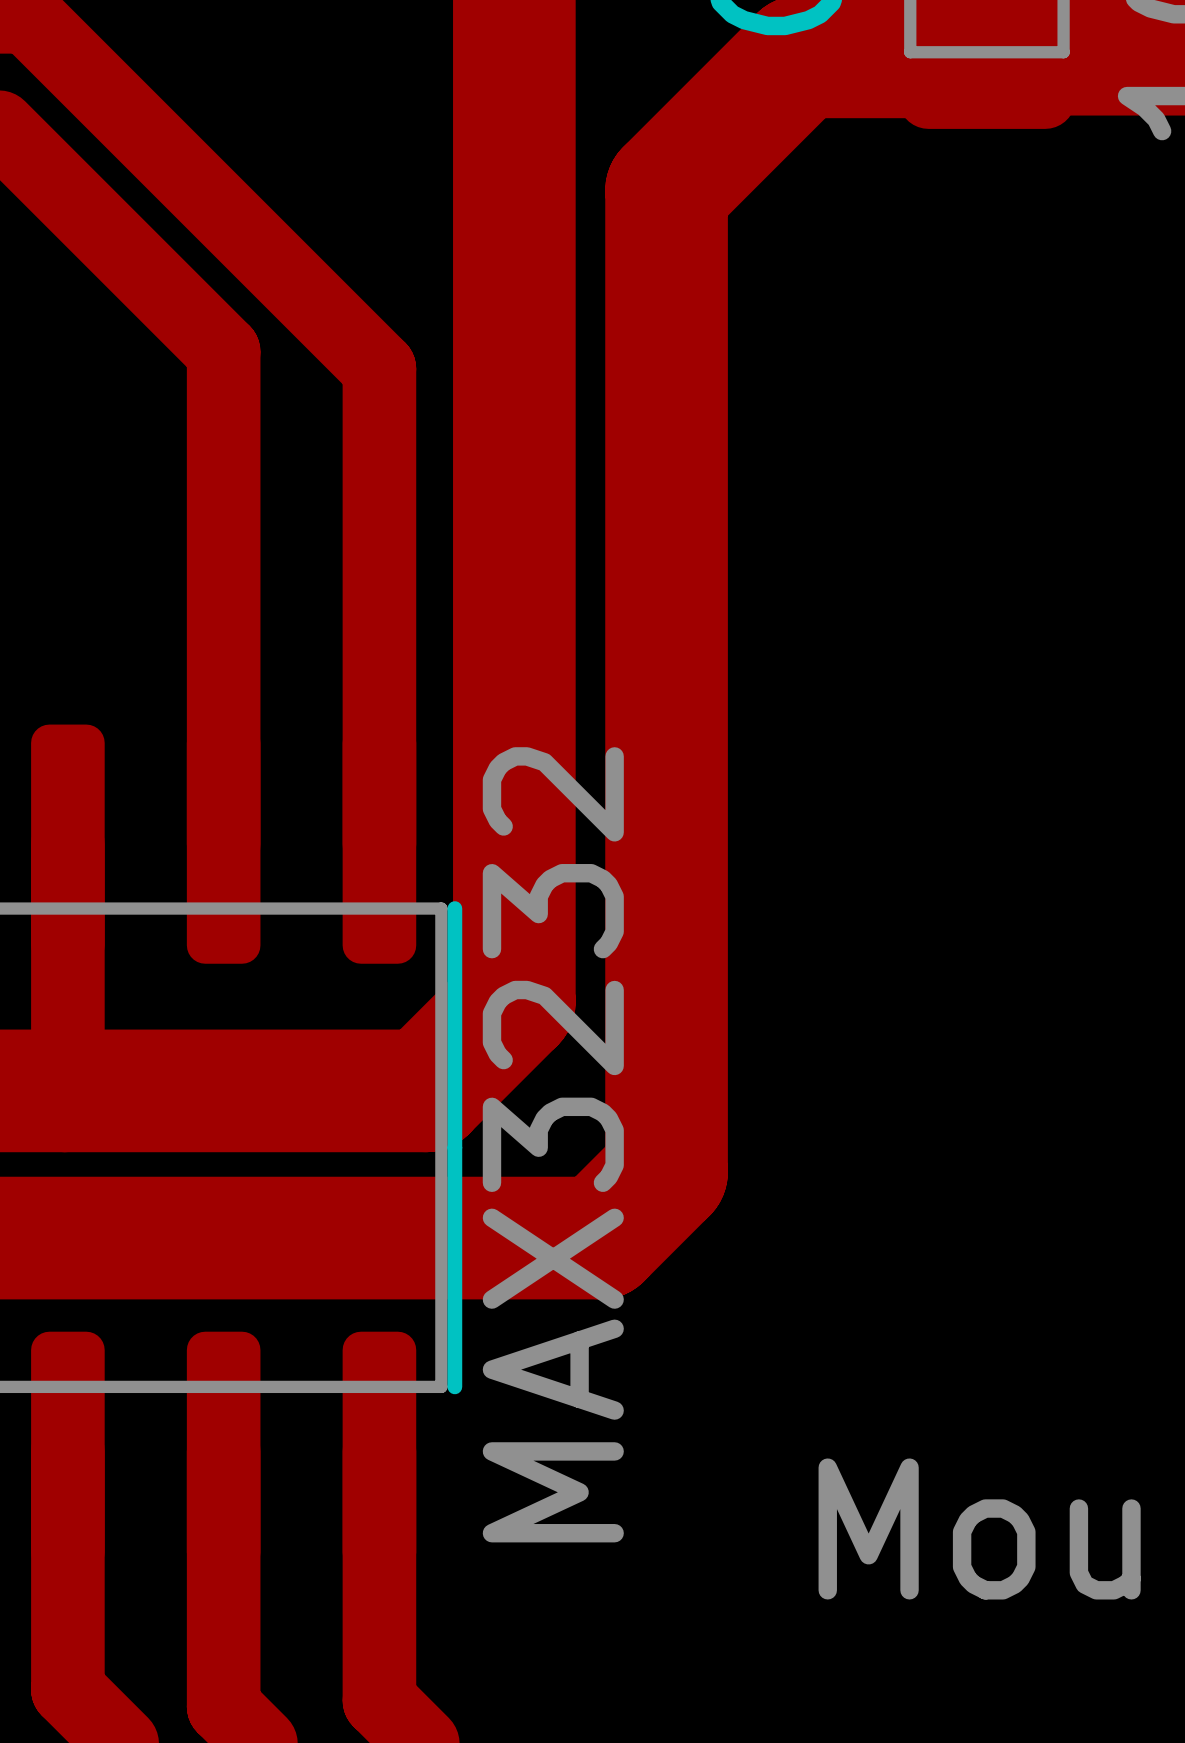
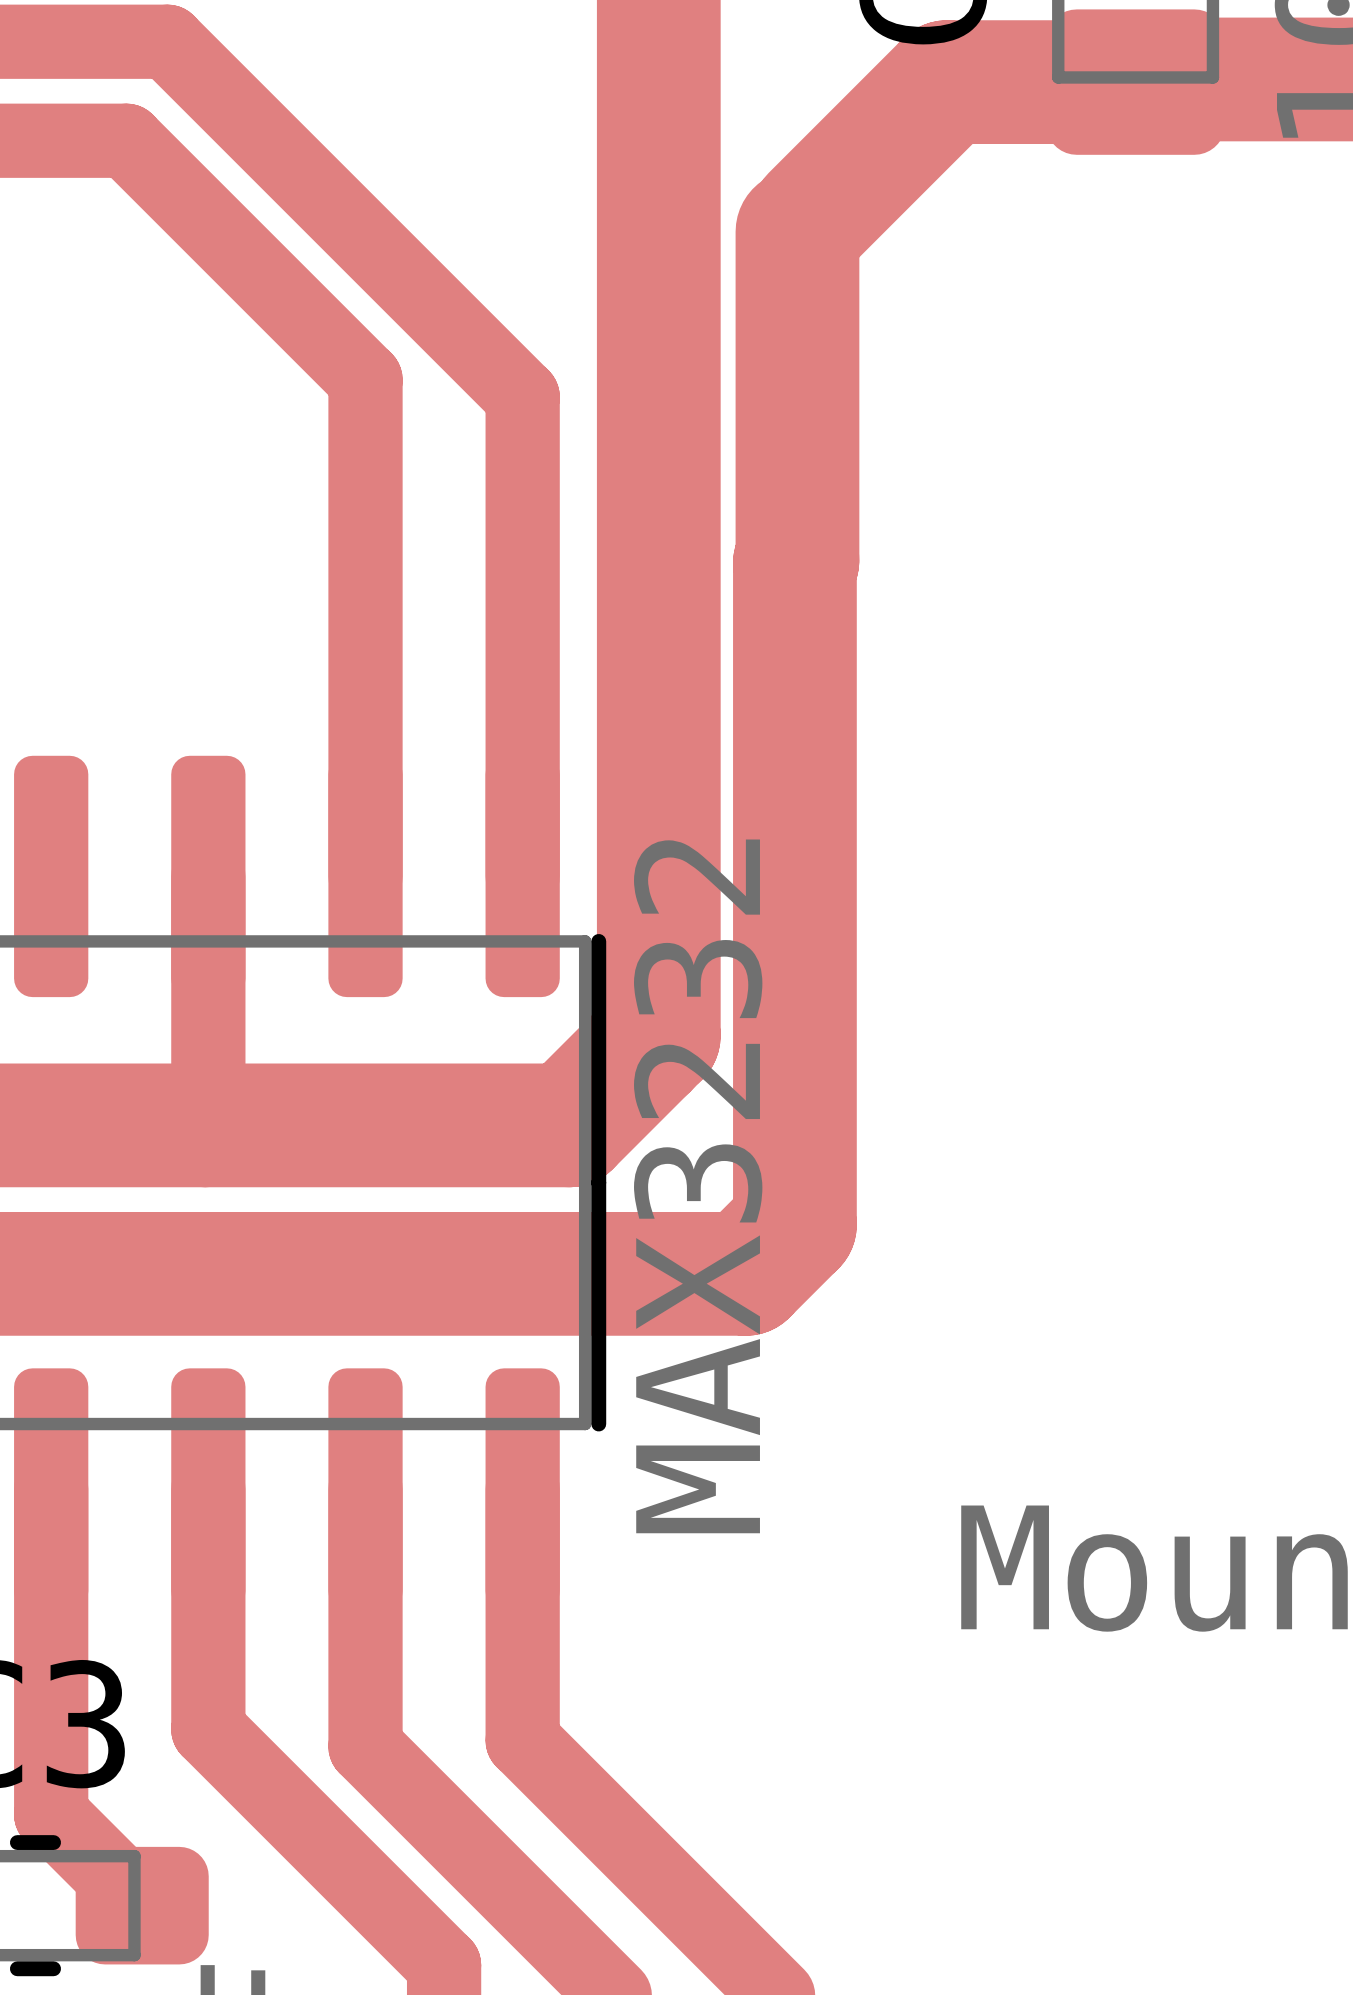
top track: (666, 190) (666, 1172) (649, 1189) -> (797, 231) (797, 560) (794, 563) (794, 1224)

